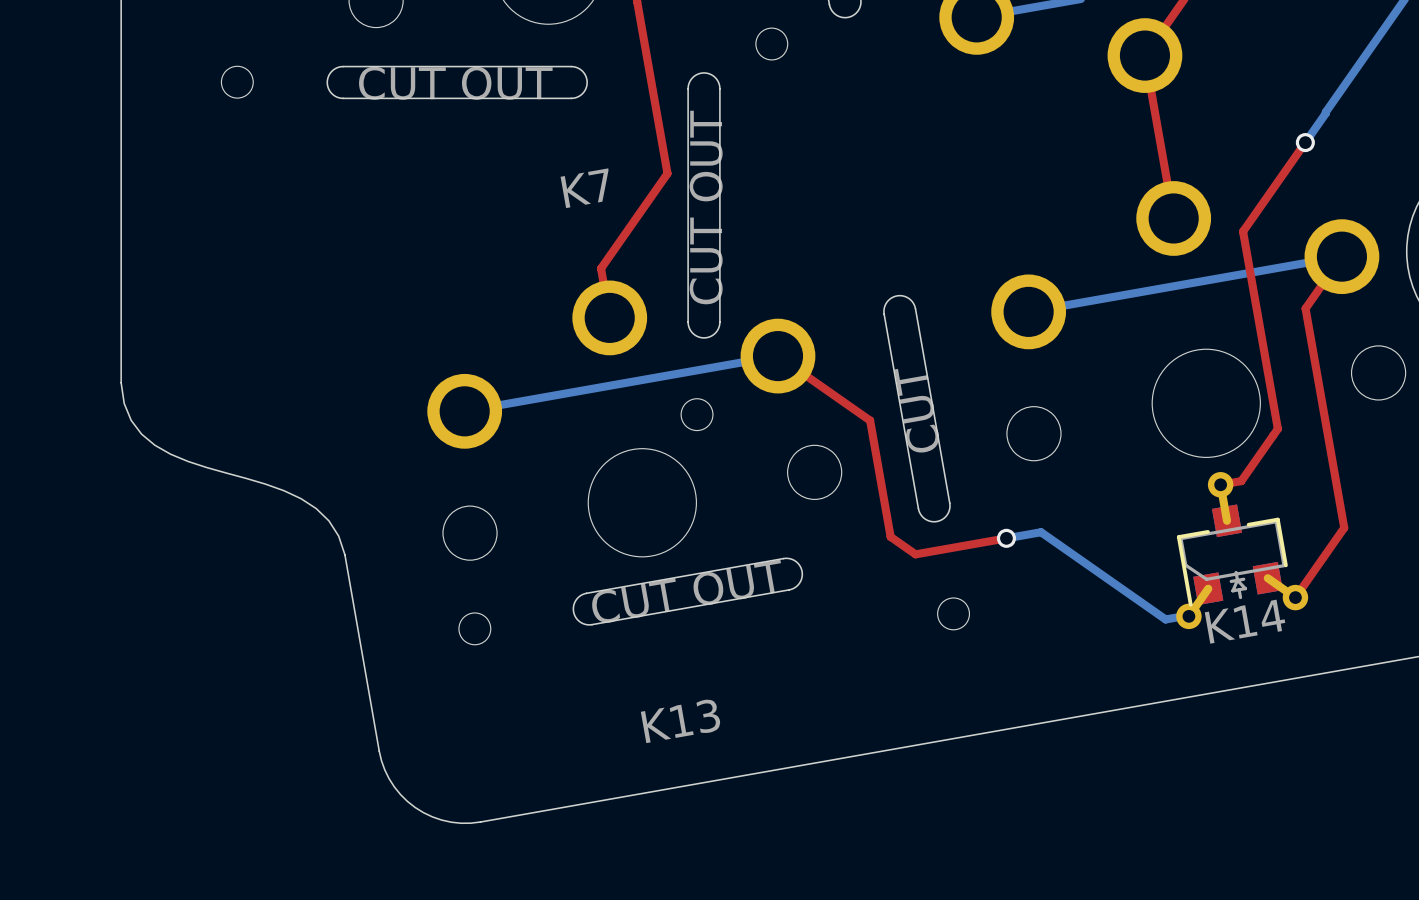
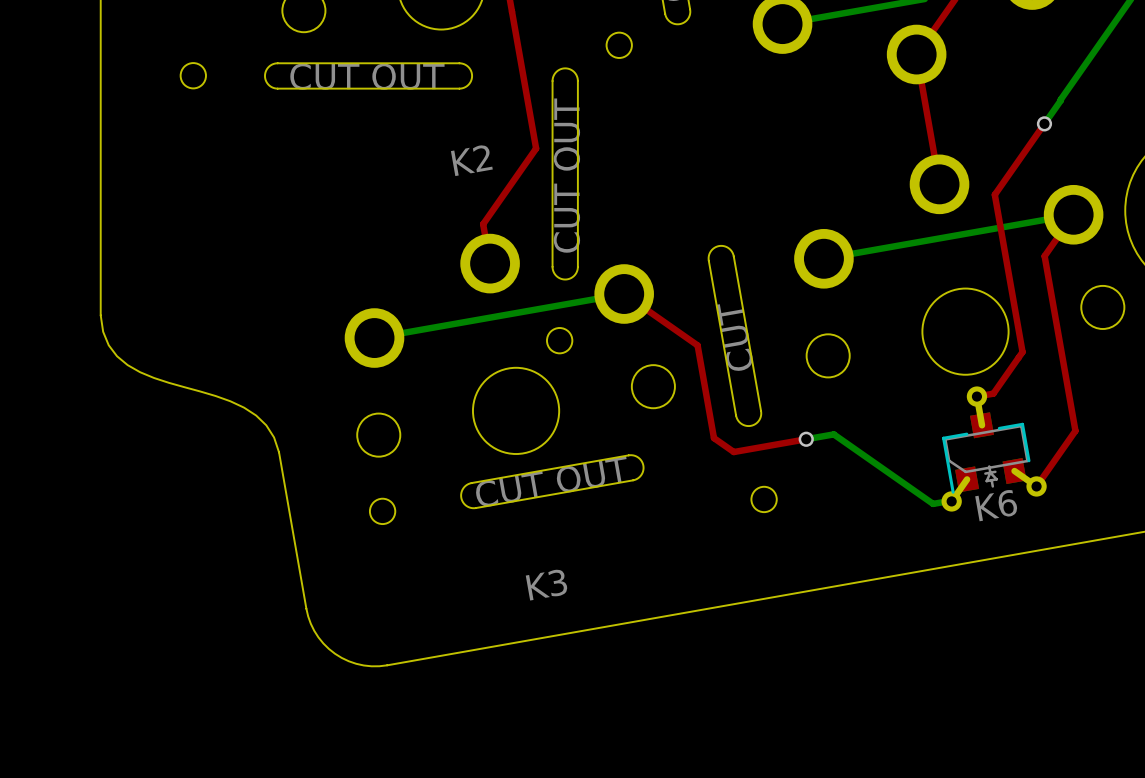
K7 name: K7 (584, 188) -> K2 (471, 160)
K14 name: K14 (1244, 621) -> K6 (996, 505)
K13 name: K13 (680, 721) -> K3 (546, 584)

